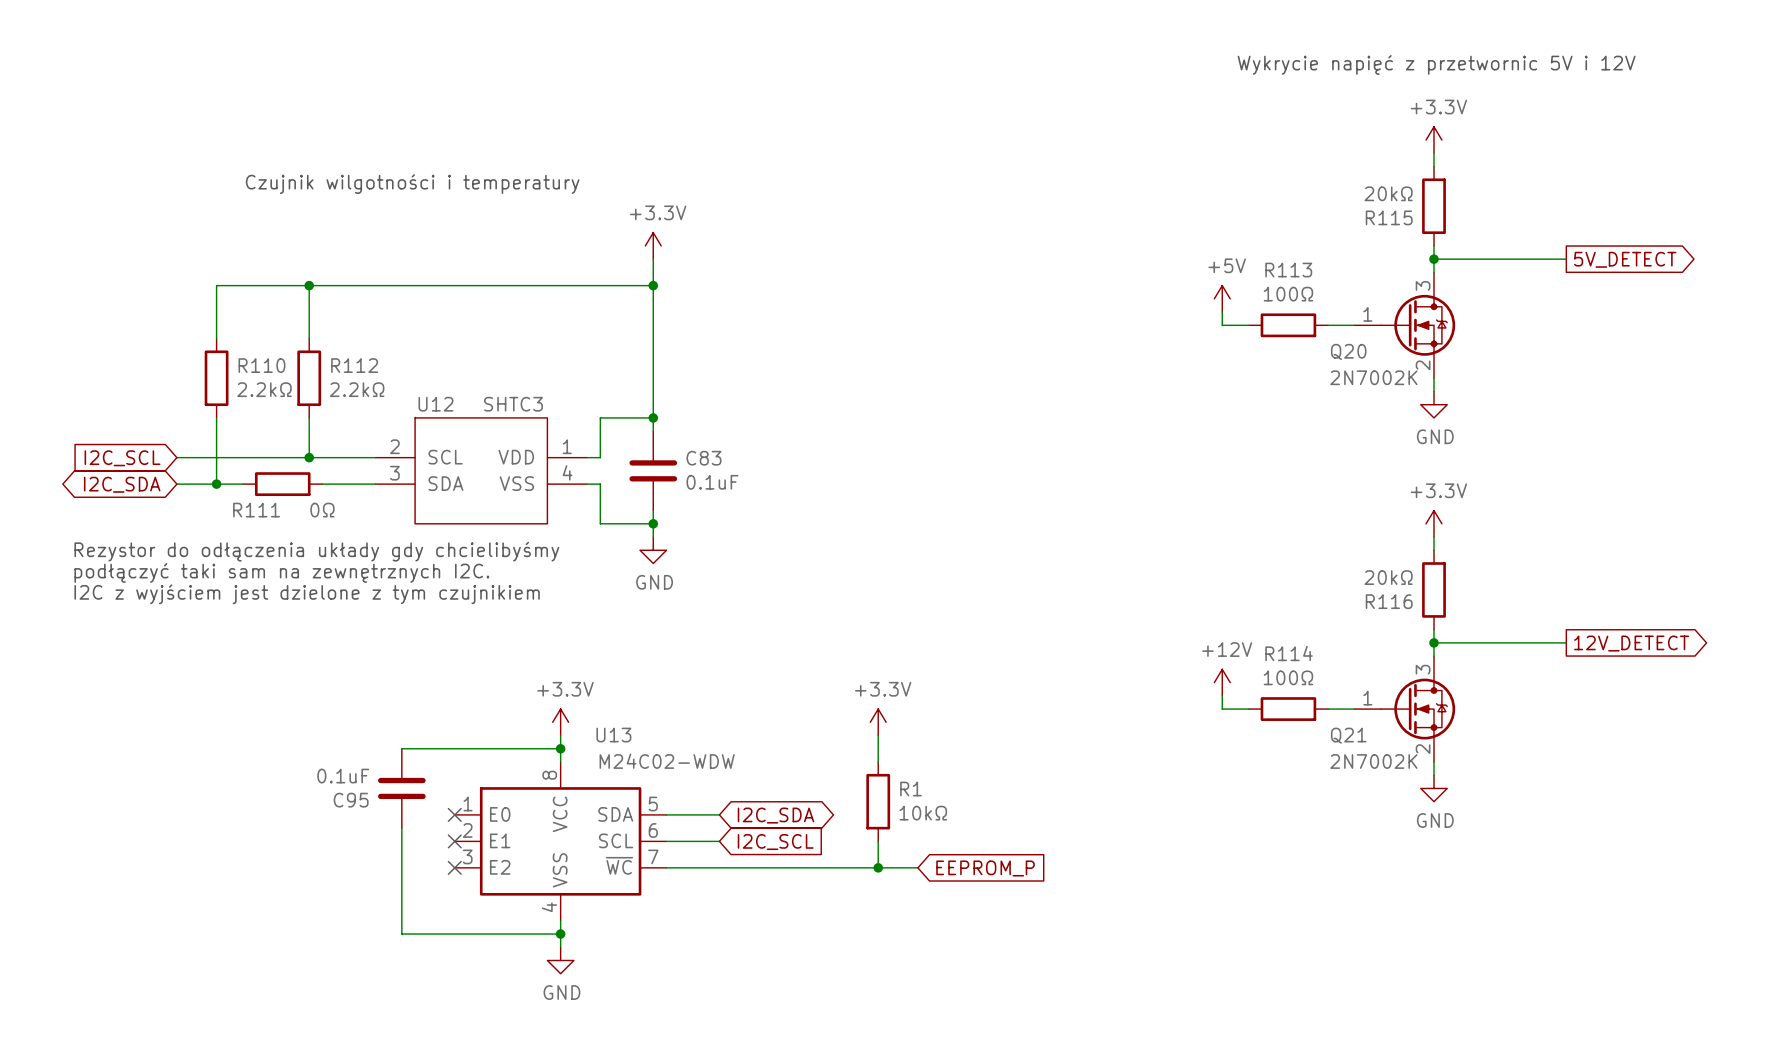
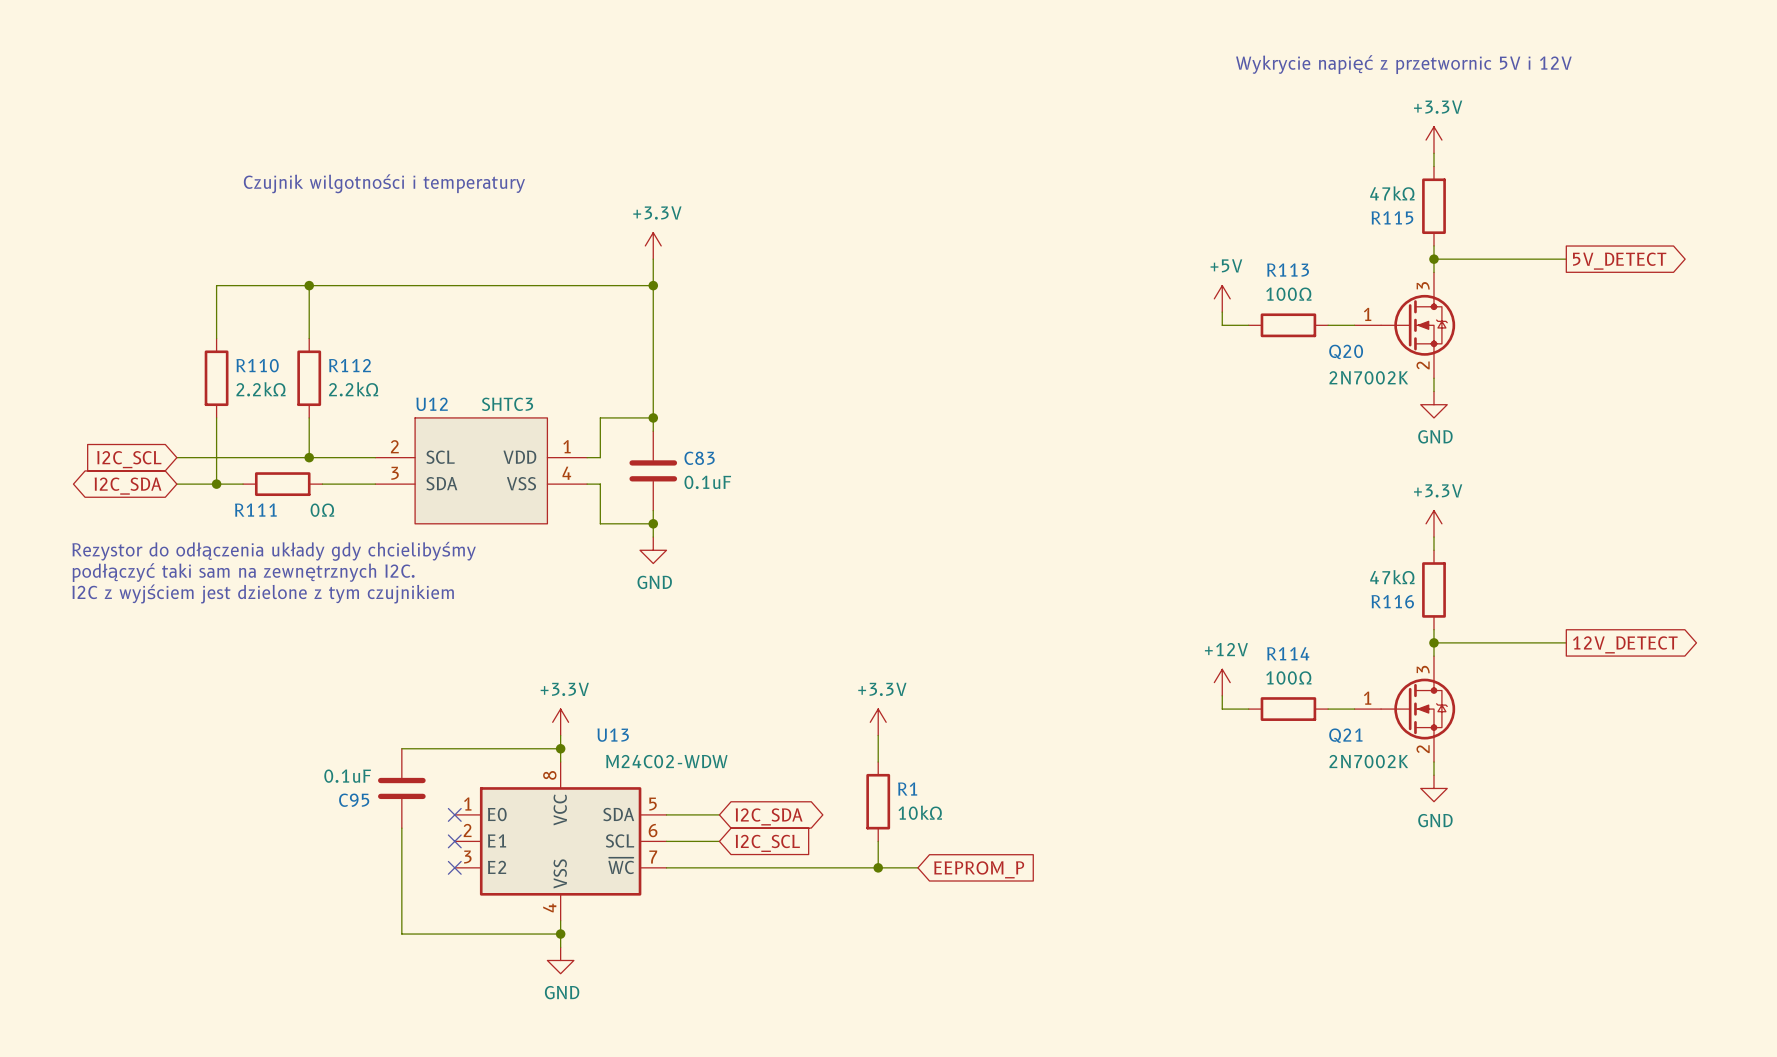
R115 value: 20kΩ (1388, 193) -> 47kΩ (1392, 193)
R116 value: 20kΩ (1388, 577) -> 47kΩ (1392, 577)

